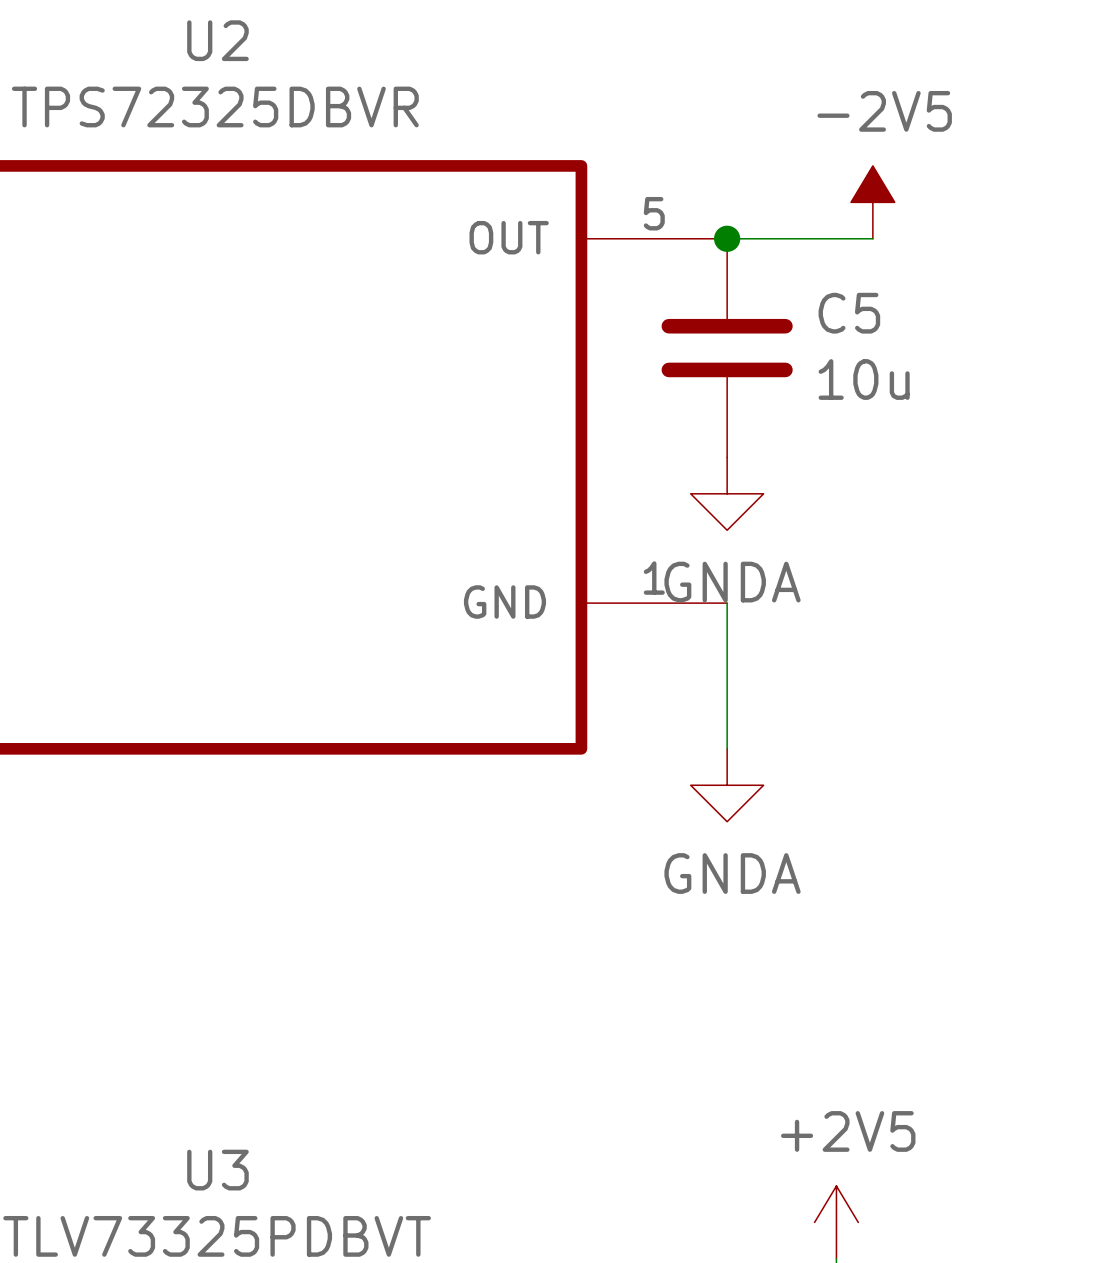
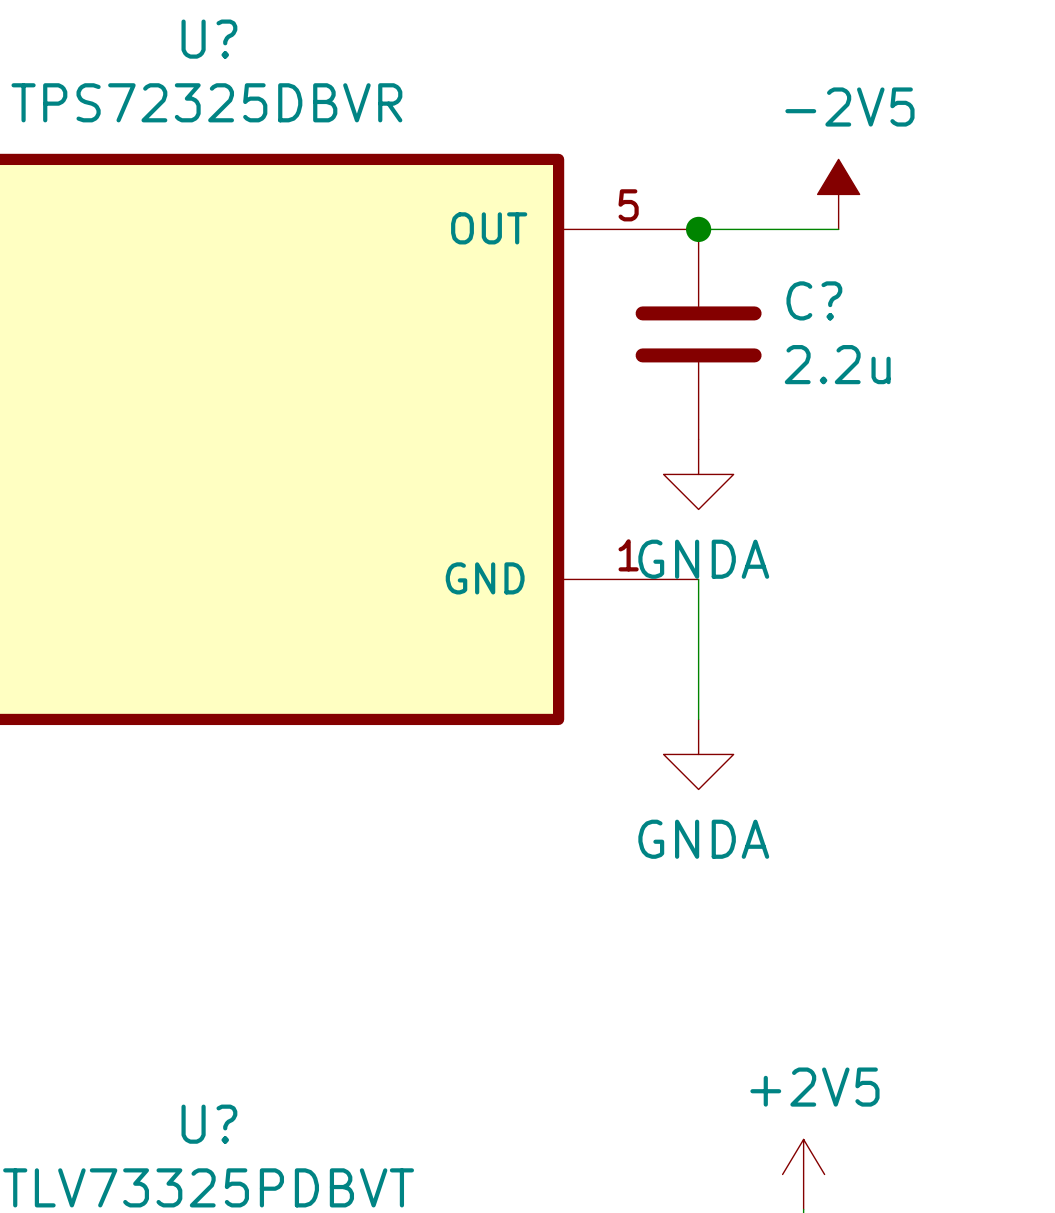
U2 name: U2 (217, 40) -> U? (209, 39)
C5 name: C5 (849, 313) -> C? (814, 300)
C5 value: 10u (864, 379) -> 2.2u (837, 364)
U3 name: U3 (217, 1170) -> U? (209, 1124)

